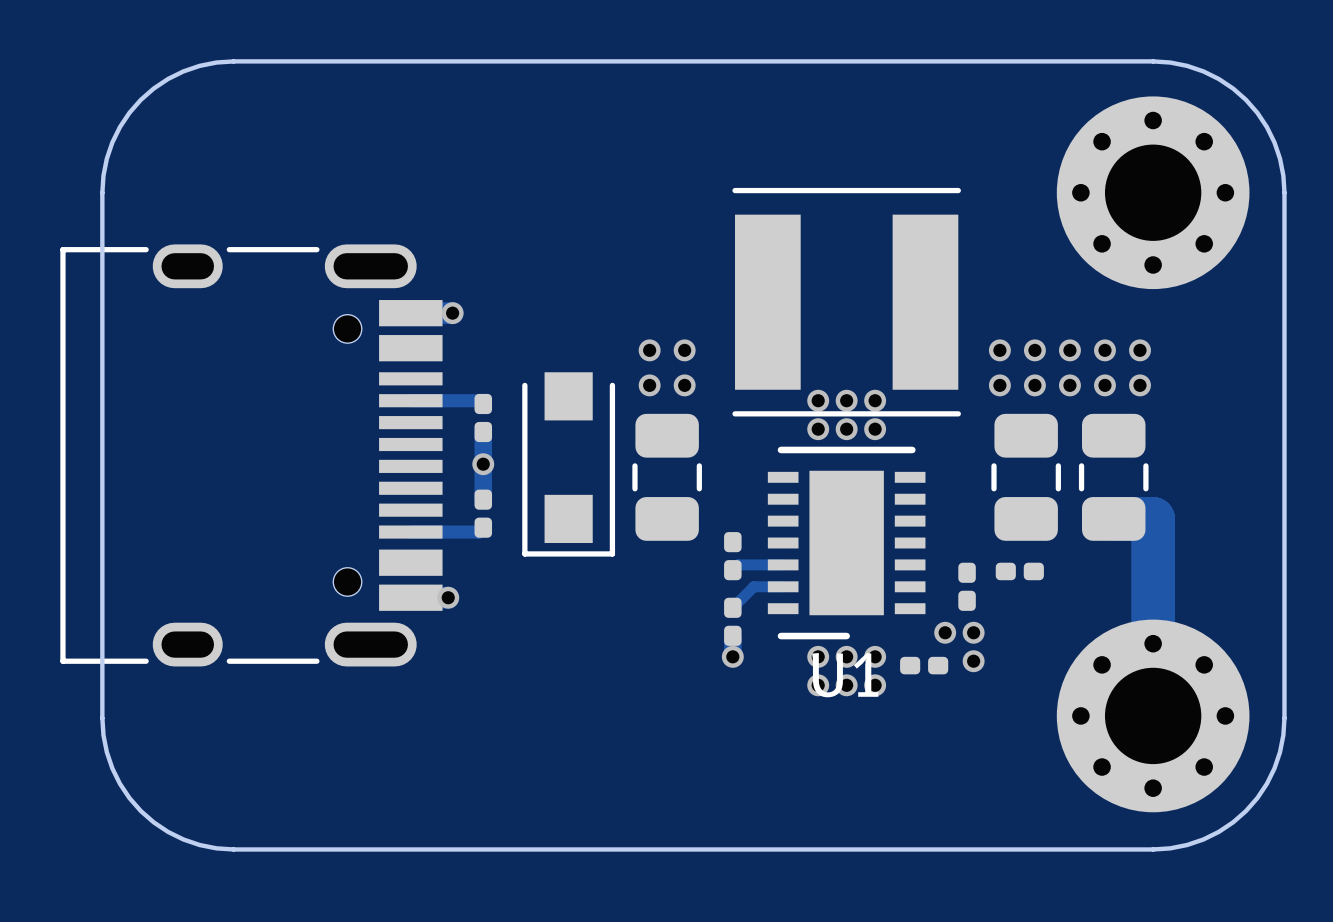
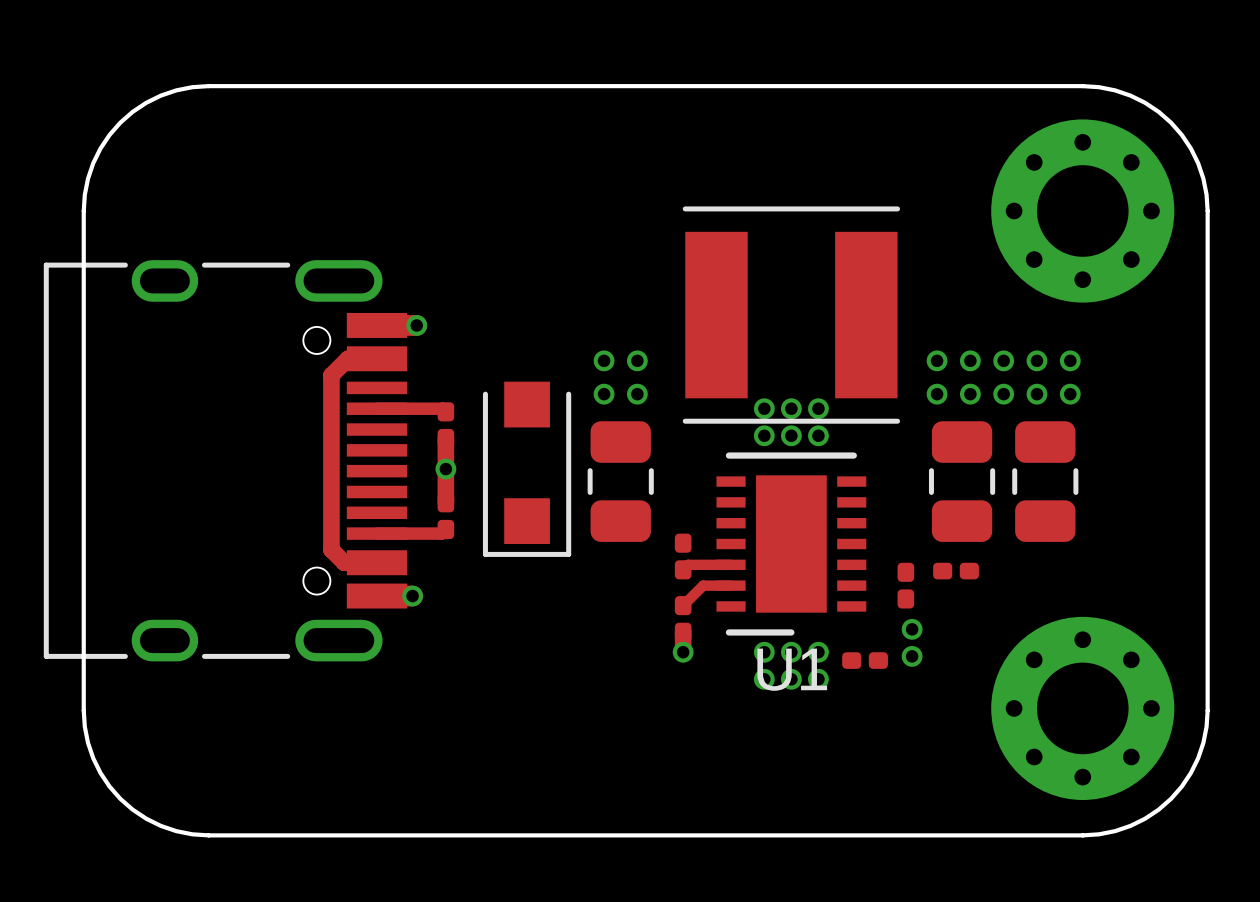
track: none -> (377, 358) (348, 358) (331, 375) (331, 549) (344, 562) (377, 562)
track: (1113, 518) (1153, 518) (1153, 715) -> none
via: (945, 632) -> none

